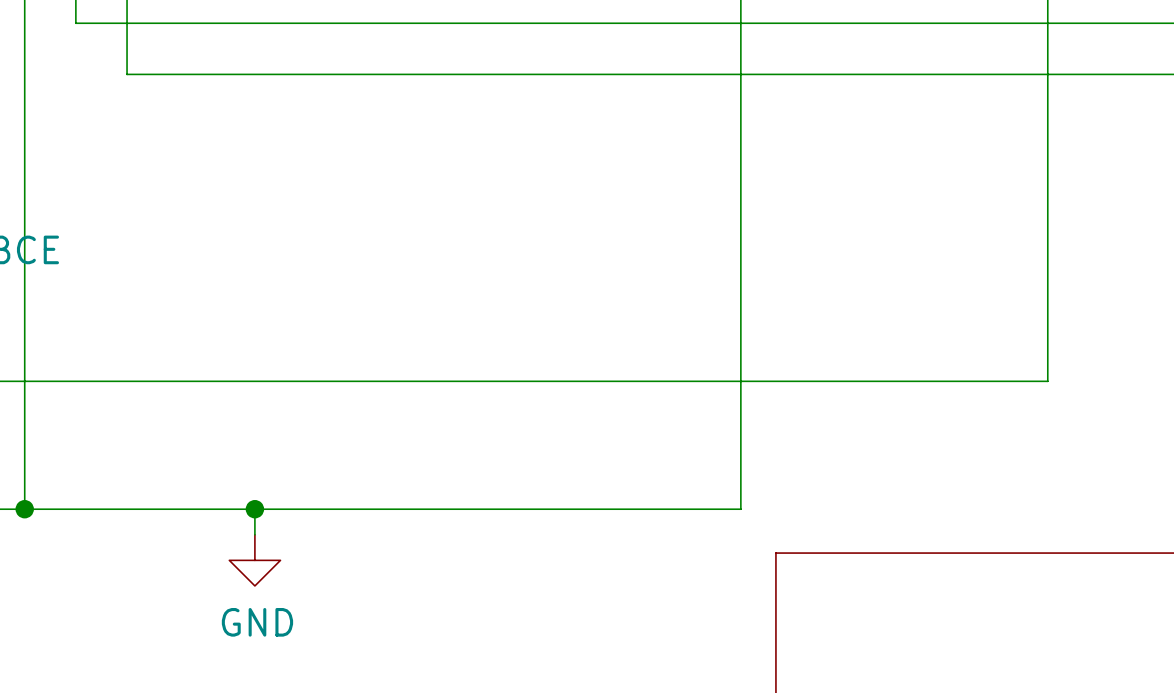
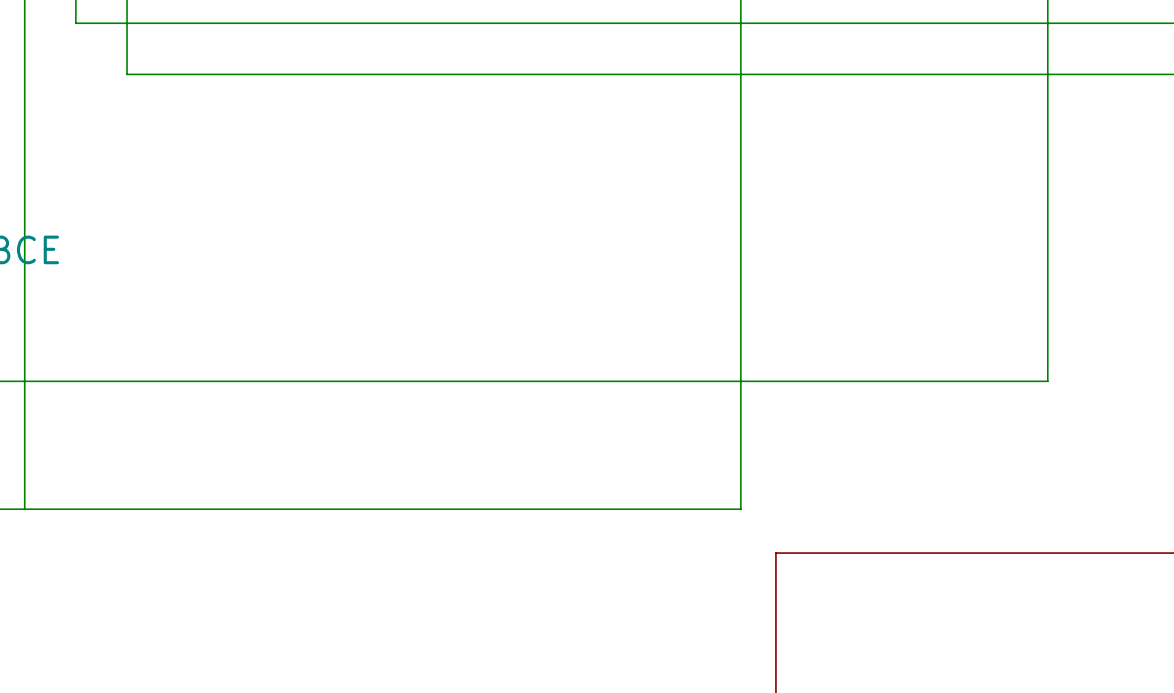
junction: (24, 509) -> none
wire: (254, 509) (254, 534) -> none
junction: (254, 509) -> none
power symbol: GND (254, 560) -> none

